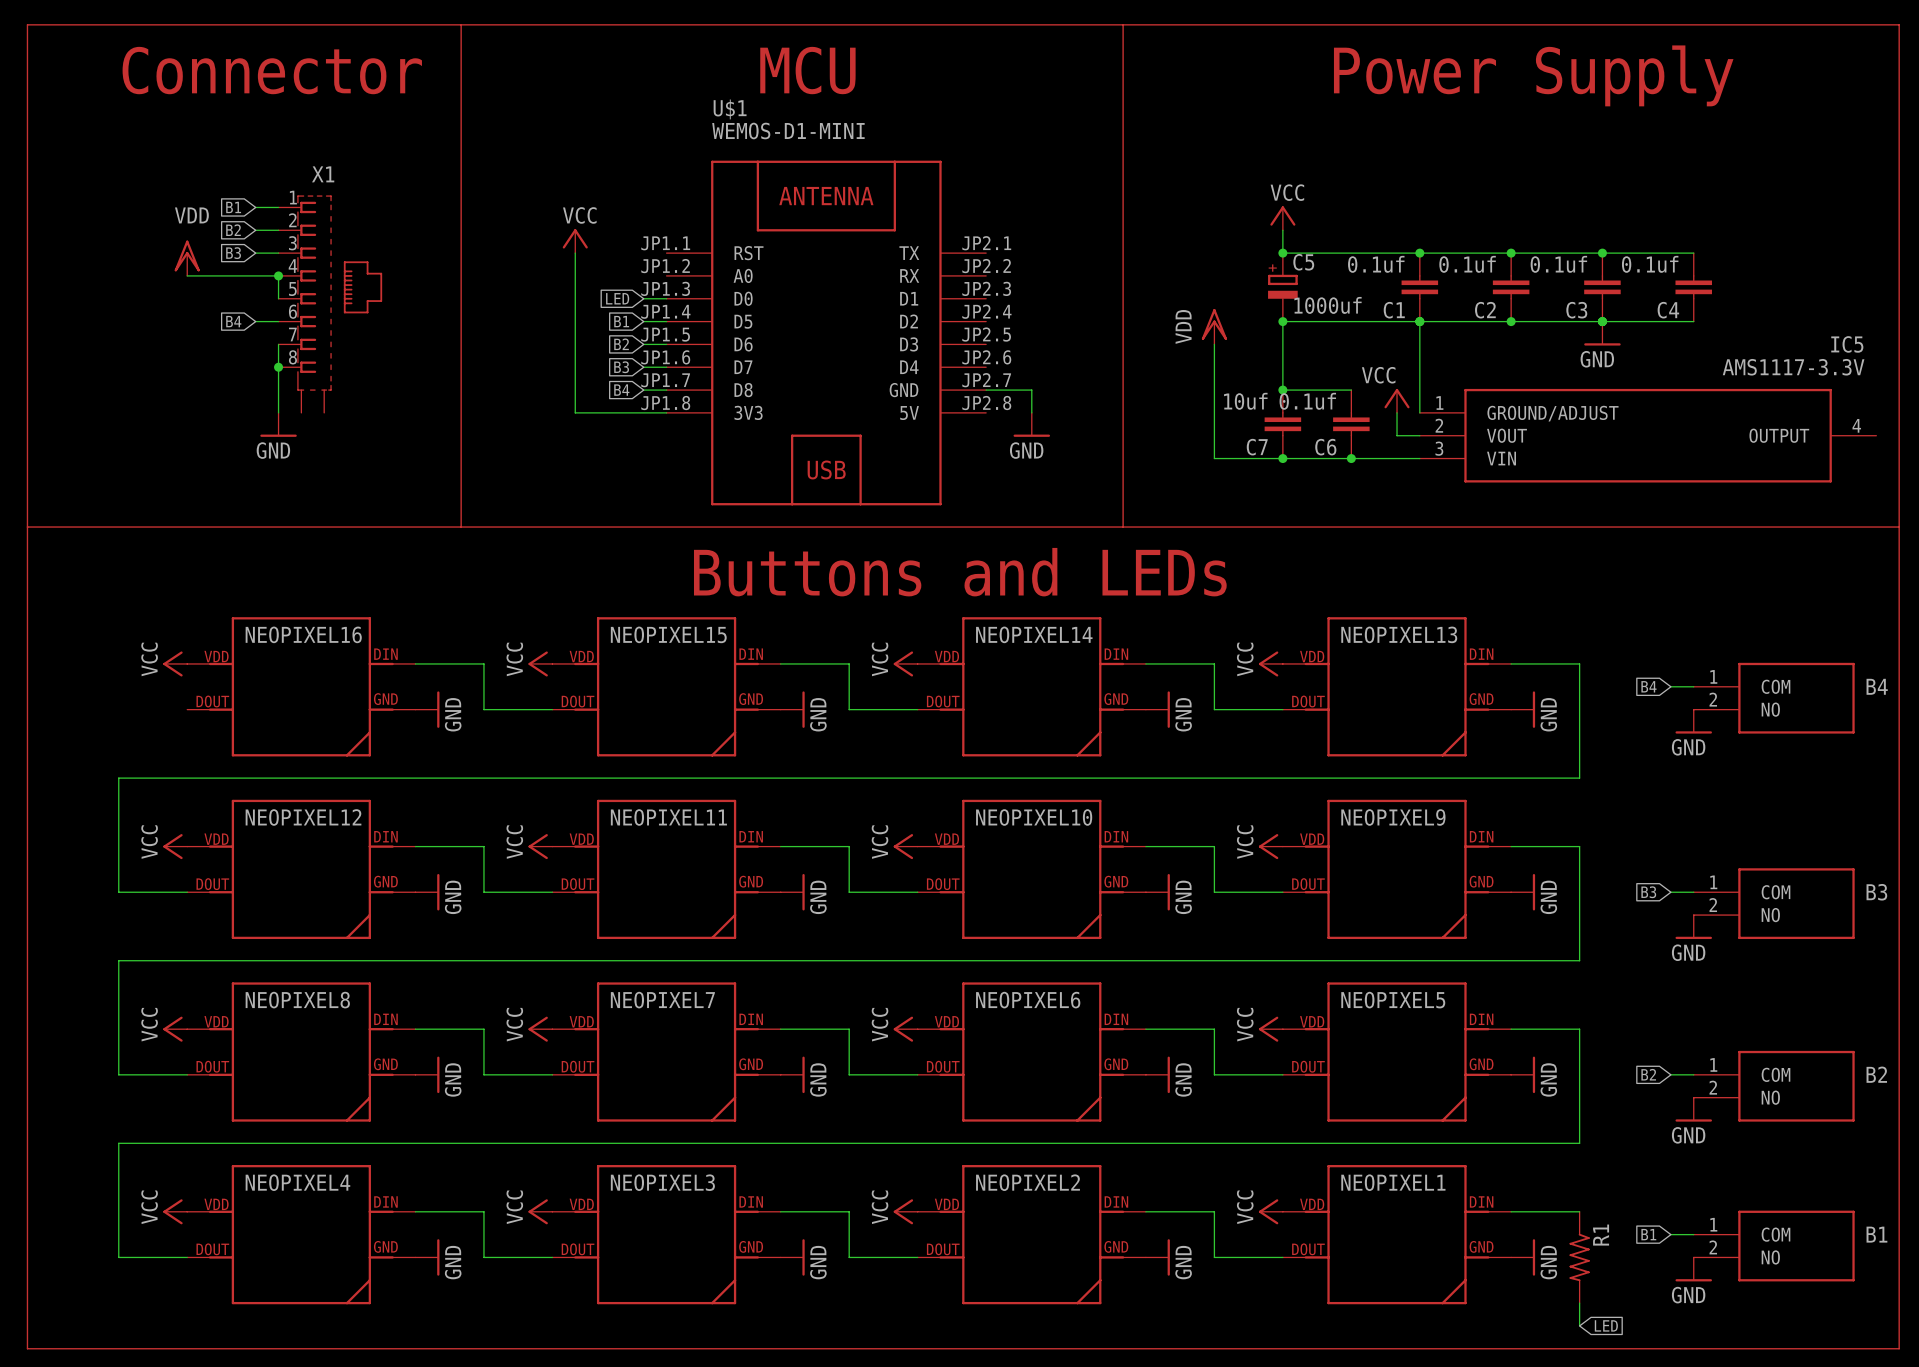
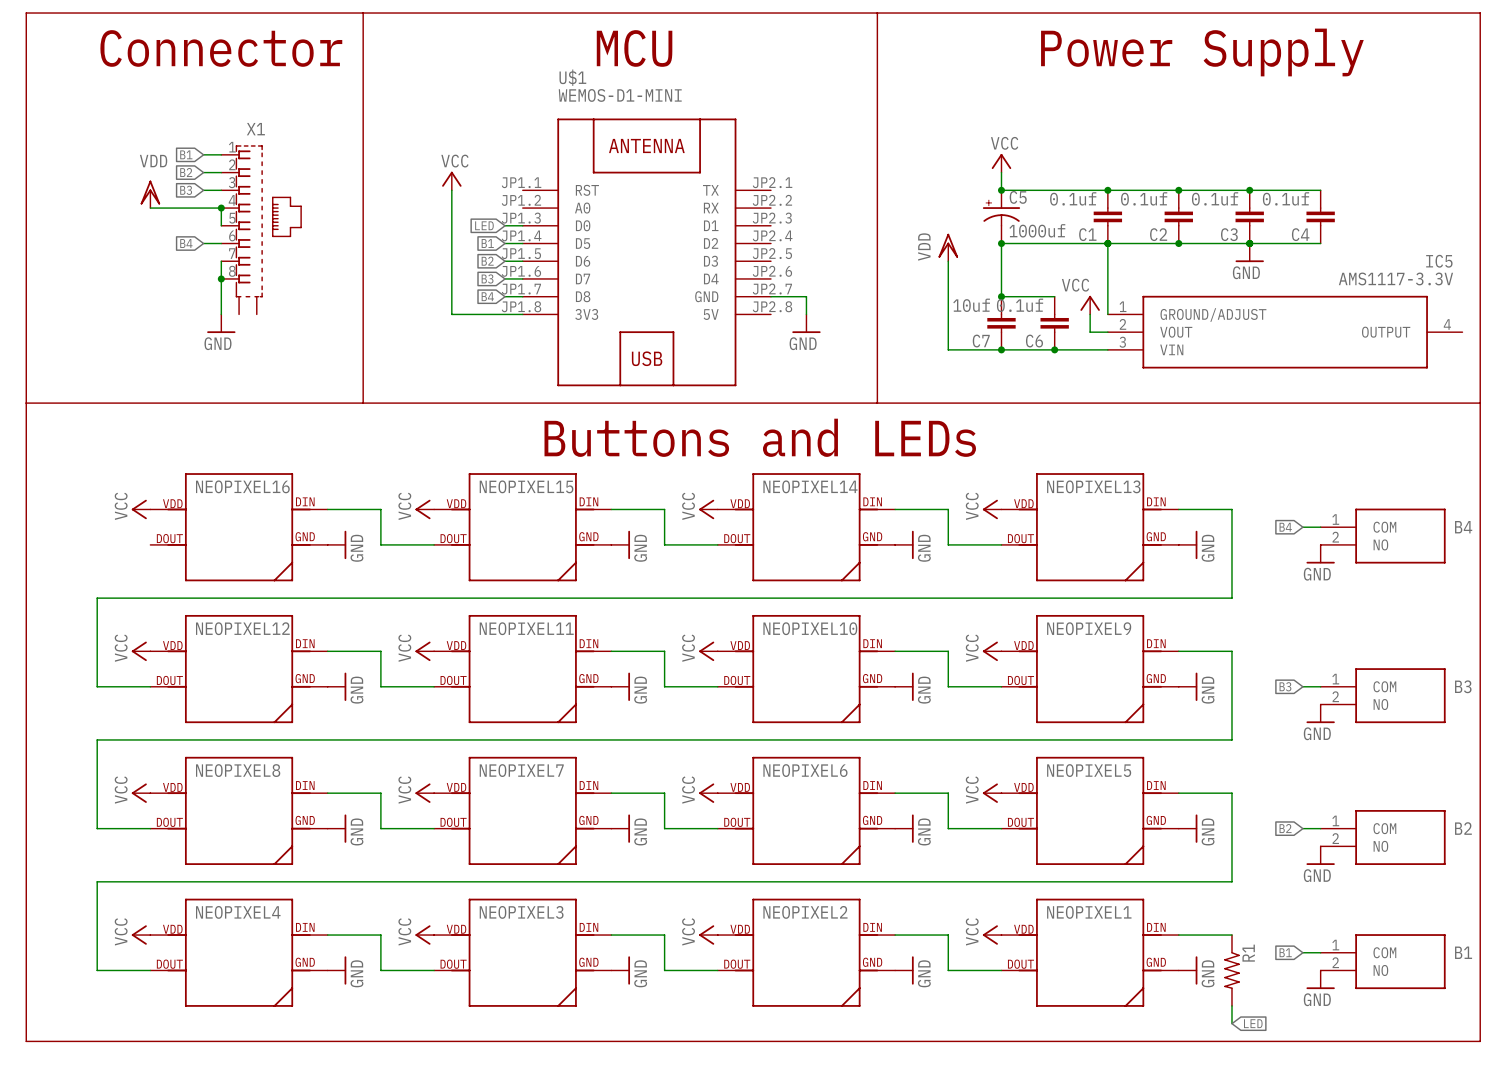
C5 symbol: [1268, 253, 1298, 322] -> [982, 190, 1021, 244]

